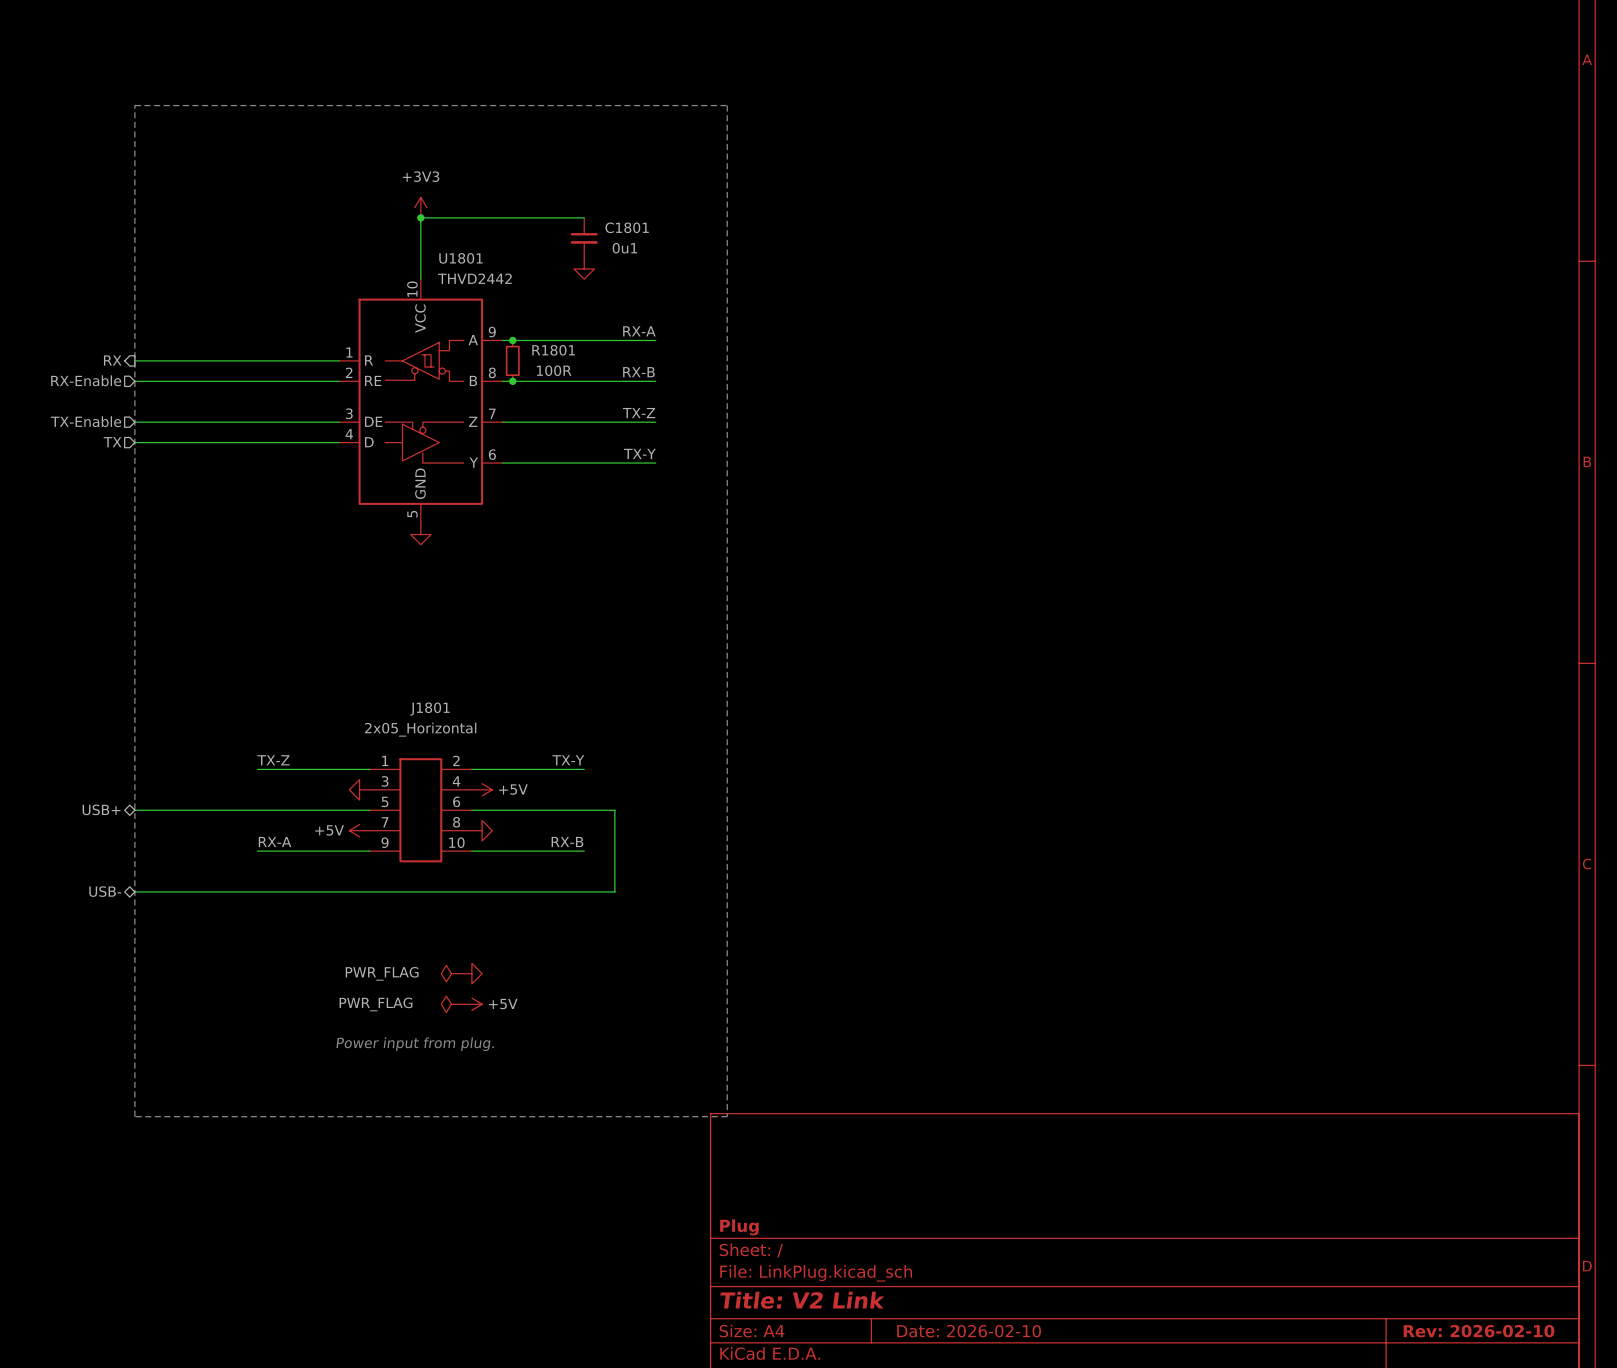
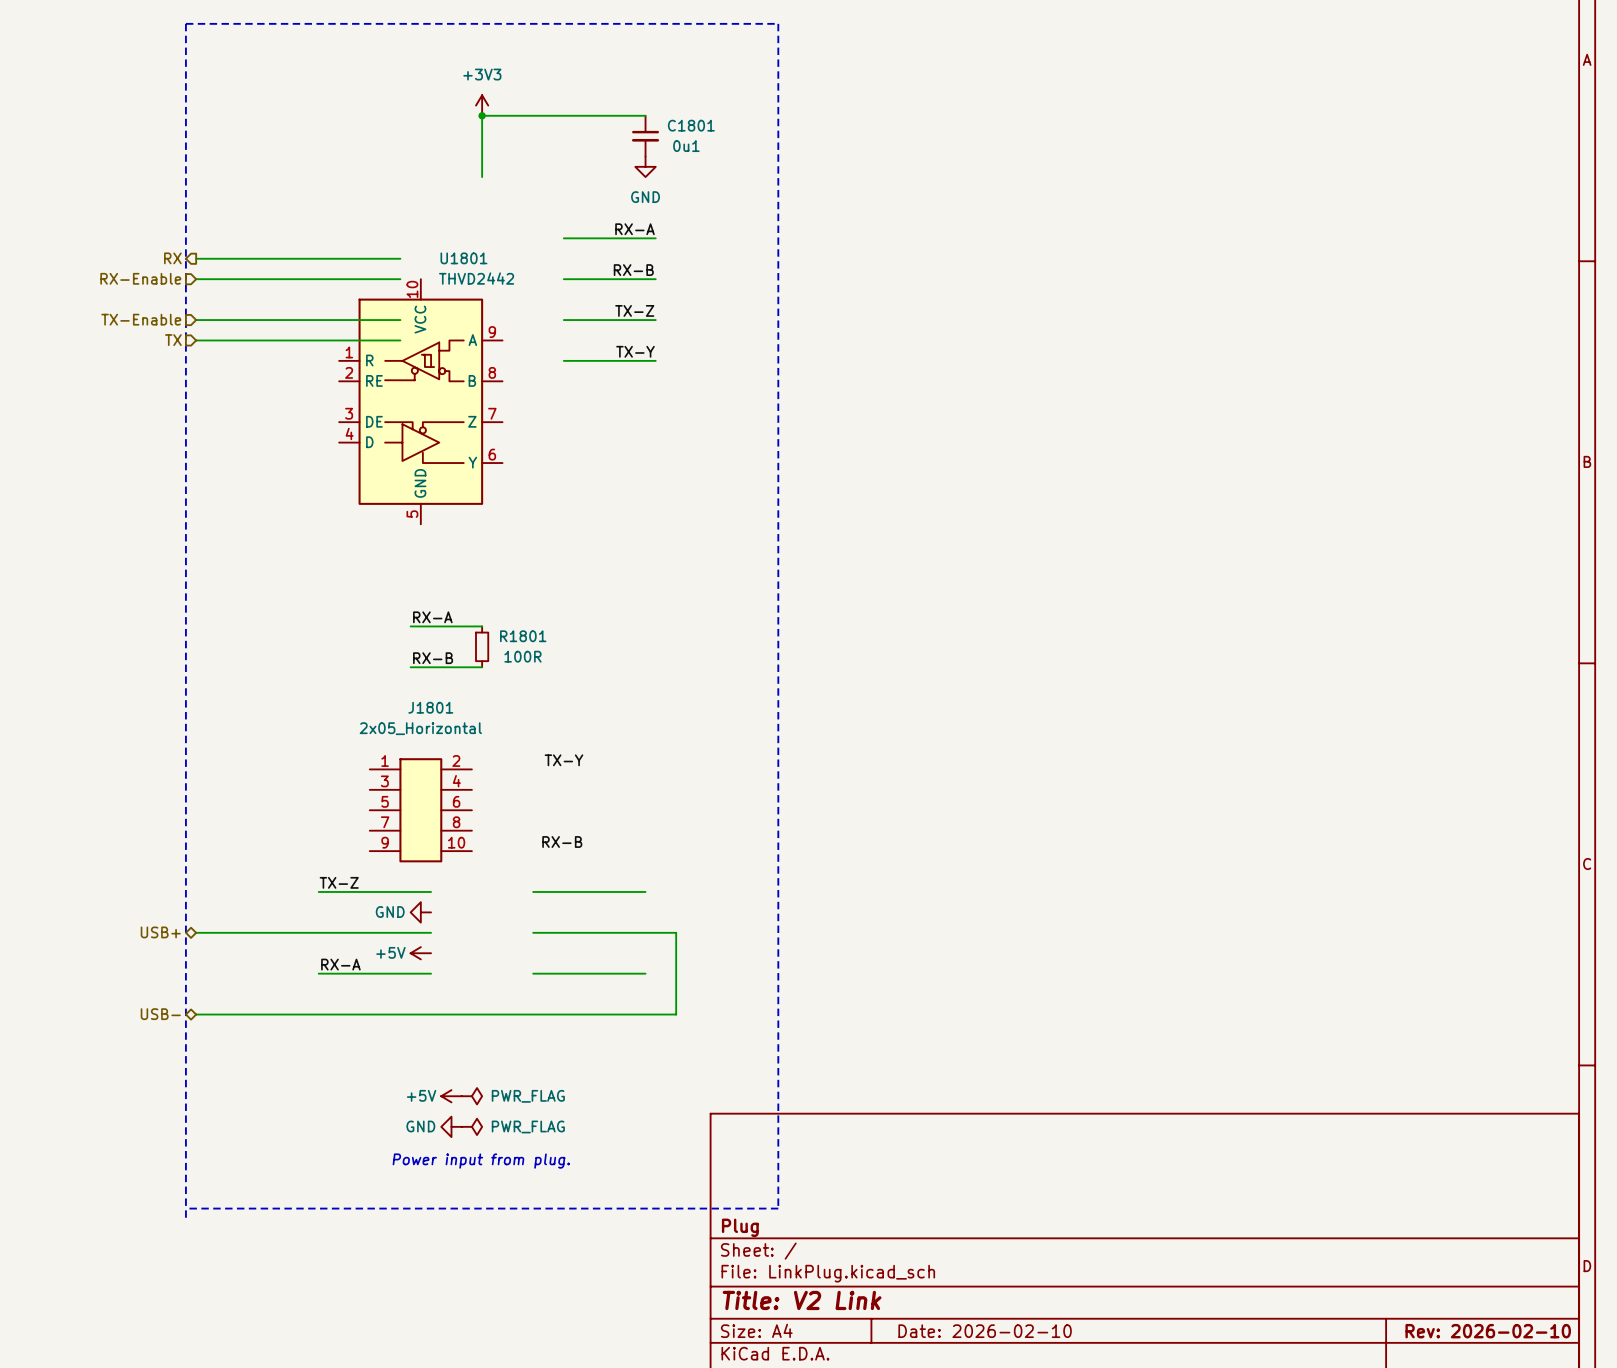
line: (134, 105) (727, 105) (727, 1116) (134, 1116) (134, 105) -> none
junction: none -> (482, 115)
power symbol: none -> GND (645, 166)
power symbol position: +3V3 (420, 207) -> +3V3 (482, 105)
junction: (420, 217) -> none
wire: (584, 217) (420, 217) (420, 279) -> (645, 115) (482, 115) (482, 177)
wire: none -> (563, 238) (655, 238)
C1801 position: (584, 238) -> (645, 136)
power symbol: (584, 268) -> none
wire: none -> (563, 279) (655, 279)
wire: none -> (563, 320) (655, 320)
label position: RX-A (639, 331) -> RX-A (635, 229)
wire: (502, 340) (655, 340) -> none
junction: (512, 340) -> none
hierarchical label position: RX (112, 360) -> RX (172, 258)
wire: (134, 360) (339, 360) -> (196, 258) (400, 258)
R1801 position: (512, 360) -> (482, 646)
wire: none -> (563, 360) (655, 360)
label position: RX-B (638, 372) -> RX-B (633, 270)
hierarchical label position: RX-Enable (86, 380) -> RX-Enable (140, 278)
wire: (134, 381) (339, 381) -> (196, 279) (400, 279)
wire: (502, 381) (655, 381) -> none
junction: (512, 381) -> none
label position: TX-Z (639, 413) -> TX-Z (634, 310)
hierarchical label position: TX-Enable (86, 421) -> TX-Enable (141, 319)
wire: (134, 422) (339, 422) -> (196, 320) (400, 320)
wire: (502, 422) (655, 422) -> none
hierarchical label position: TX (112, 442) -> TX (173, 340)
wire: (134, 442) (339, 442) -> (196, 340) (400, 340)
label position: TX-Y (639, 453) -> TX-Y (635, 351)
wire: (502, 463) (655, 463) -> none
power symbol: (420, 534) -> none
label: none -> RX-A (432, 617)
wire: none -> (410, 626) (482, 626)
label: none -> RX-B (433, 658)
wire: none -> (410, 667) (482, 667)
label position: TX-Z (273, 760) -> TX-Z (339, 882)
wire: (257, 769) (369, 769) -> none
wire: (471, 769) (584, 769) -> none
power symbol: (359, 789) -> none
power symbol: +5V (482, 789) -> none
hierarchical label position: USB+ (101, 809) -> USB+ (160, 932)
wire: (134, 810) (369, 810) -> (196, 932) (431, 932)
wire: (471, 810) (614, 810) (614, 891) -> (645, 891) (614, 891)
power symbol: +5V (359, 830) -> none
power symbol: (482, 830) -> none
label: RX-A (275, 842) -> none
wire: (257, 851) (369, 851) -> (318, 973) (431, 973)
wire: (471, 851) (584, 851) -> (533, 973) (645, 973)
hierarchical label position: USB- (105, 891) -> USB- (160, 1014)
wire: (134, 891) (318, 891) -> none
wire: (431, 891) (533, 891) -> none
power symbol: none -> GND (420, 912)
wire: none -> (533, 932) (676, 932) (676, 1014) (196, 1014)
power symbol: none -> +5V (420, 953)
label: none -> RX-A (340, 964)
power symbol: PWR_FLAG (451, 973) -> none
power symbol: (471, 973) -> none
power symbol: PWR_FLAG (451, 1004) -> none
power symbol: +5V (471, 1004) -> none
text position: Power input from plug. (415, 1044) -> Power input from plug. (481, 1161)
power symbol: none -> +5V (451, 1096)
power symbol: none -> PWR_FLAG (471, 1096)
power symbol: none -> GND (451, 1126)
power symbol: none -> PWR_FLAG (471, 1126)
line: none -> (185, 1208) (778, 1208) (778, 23) (185, 23) (185, 1218)

